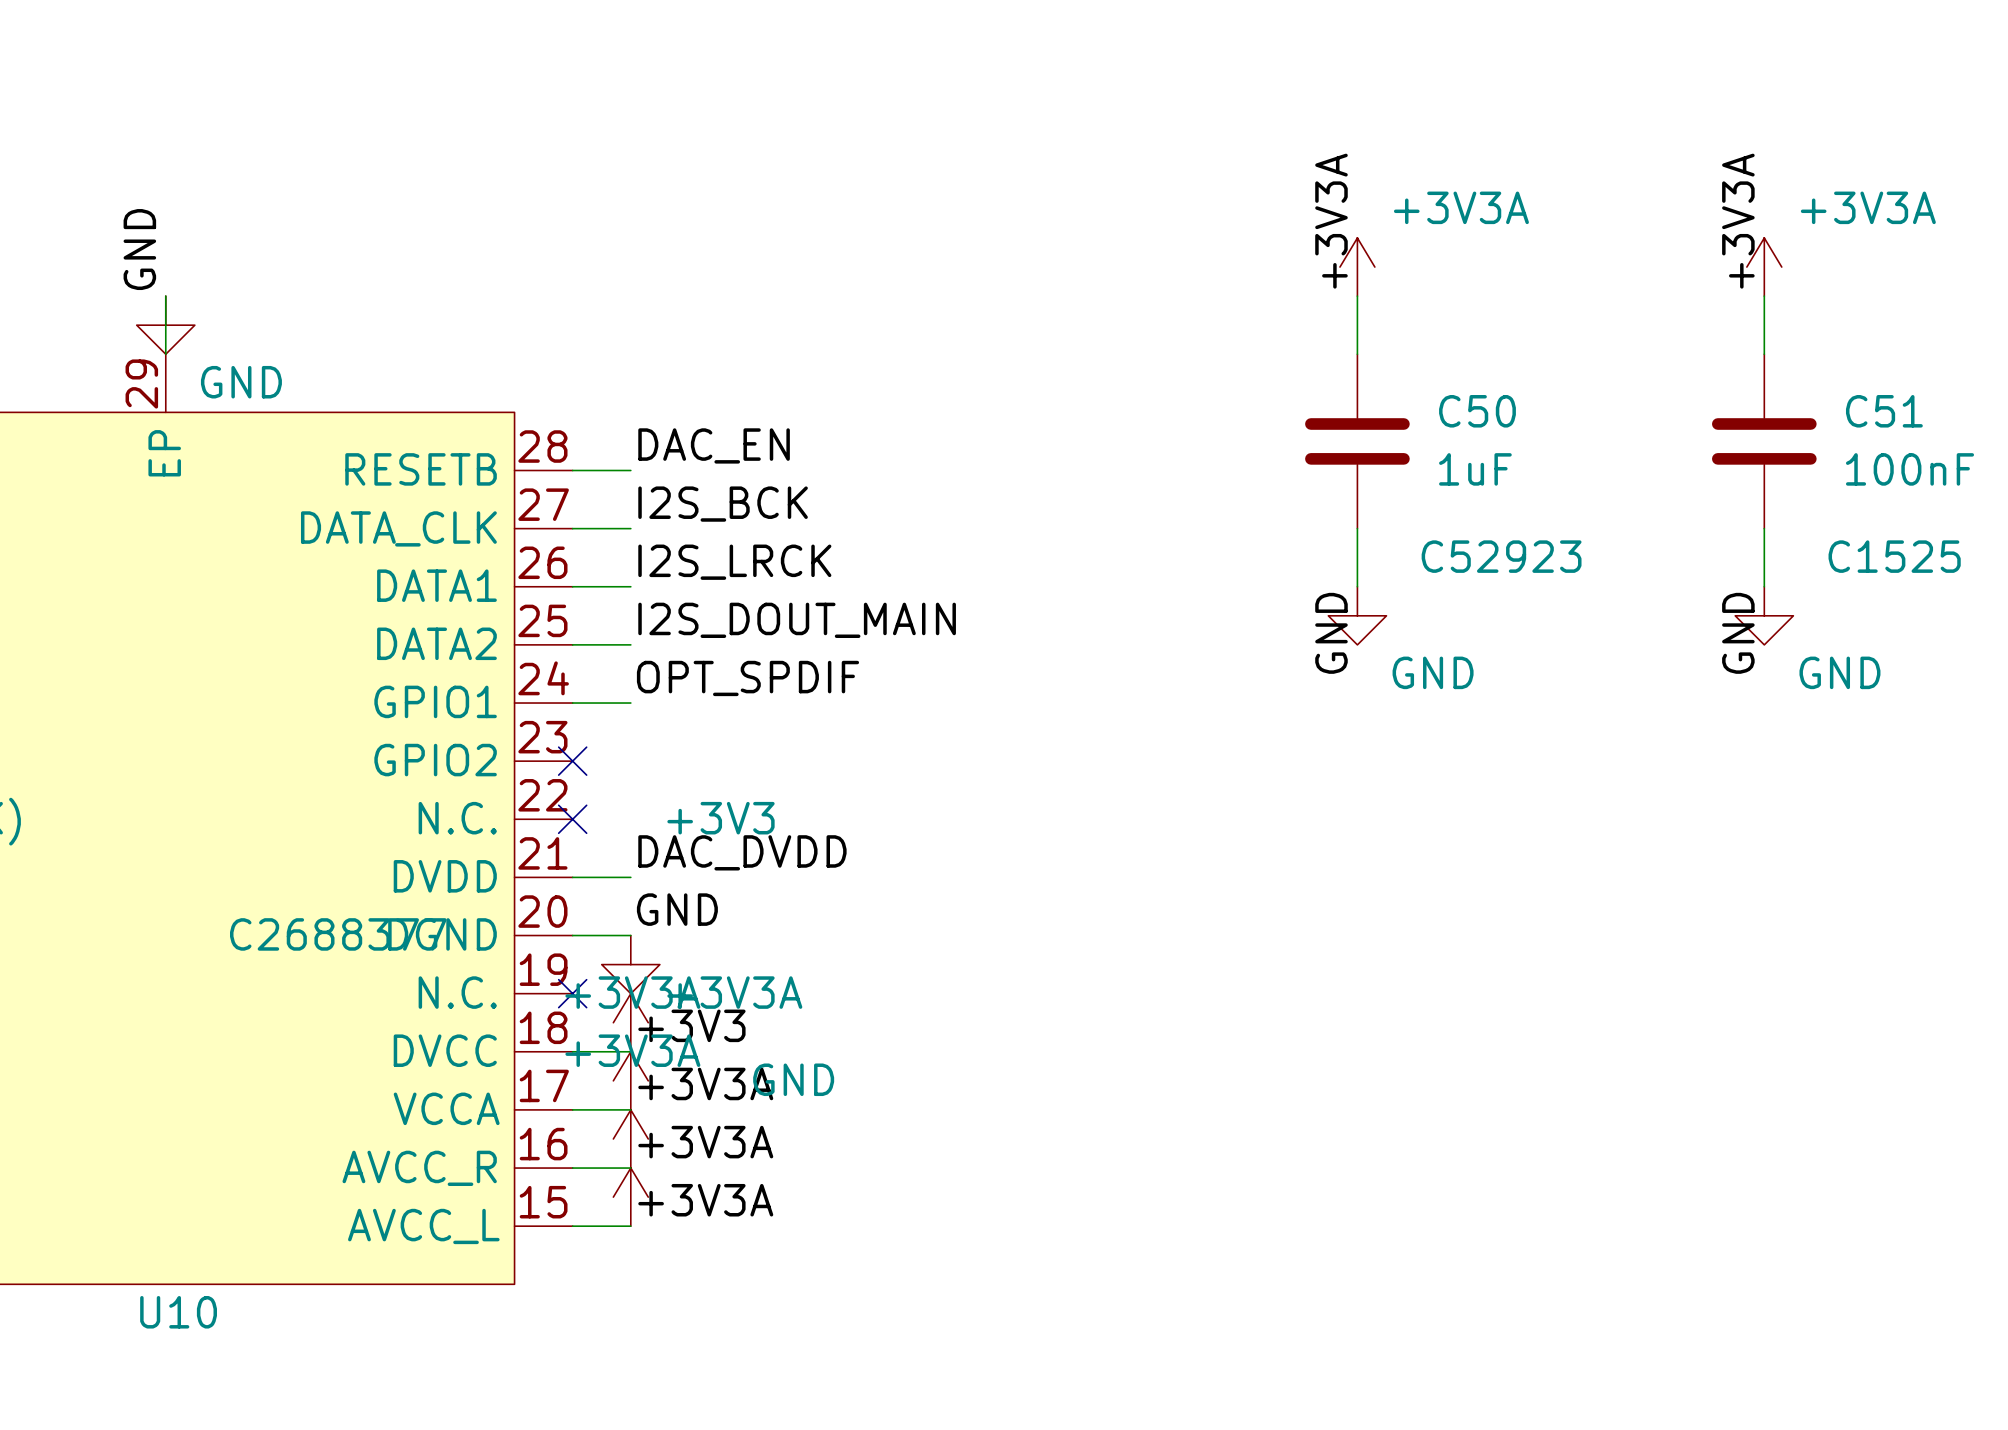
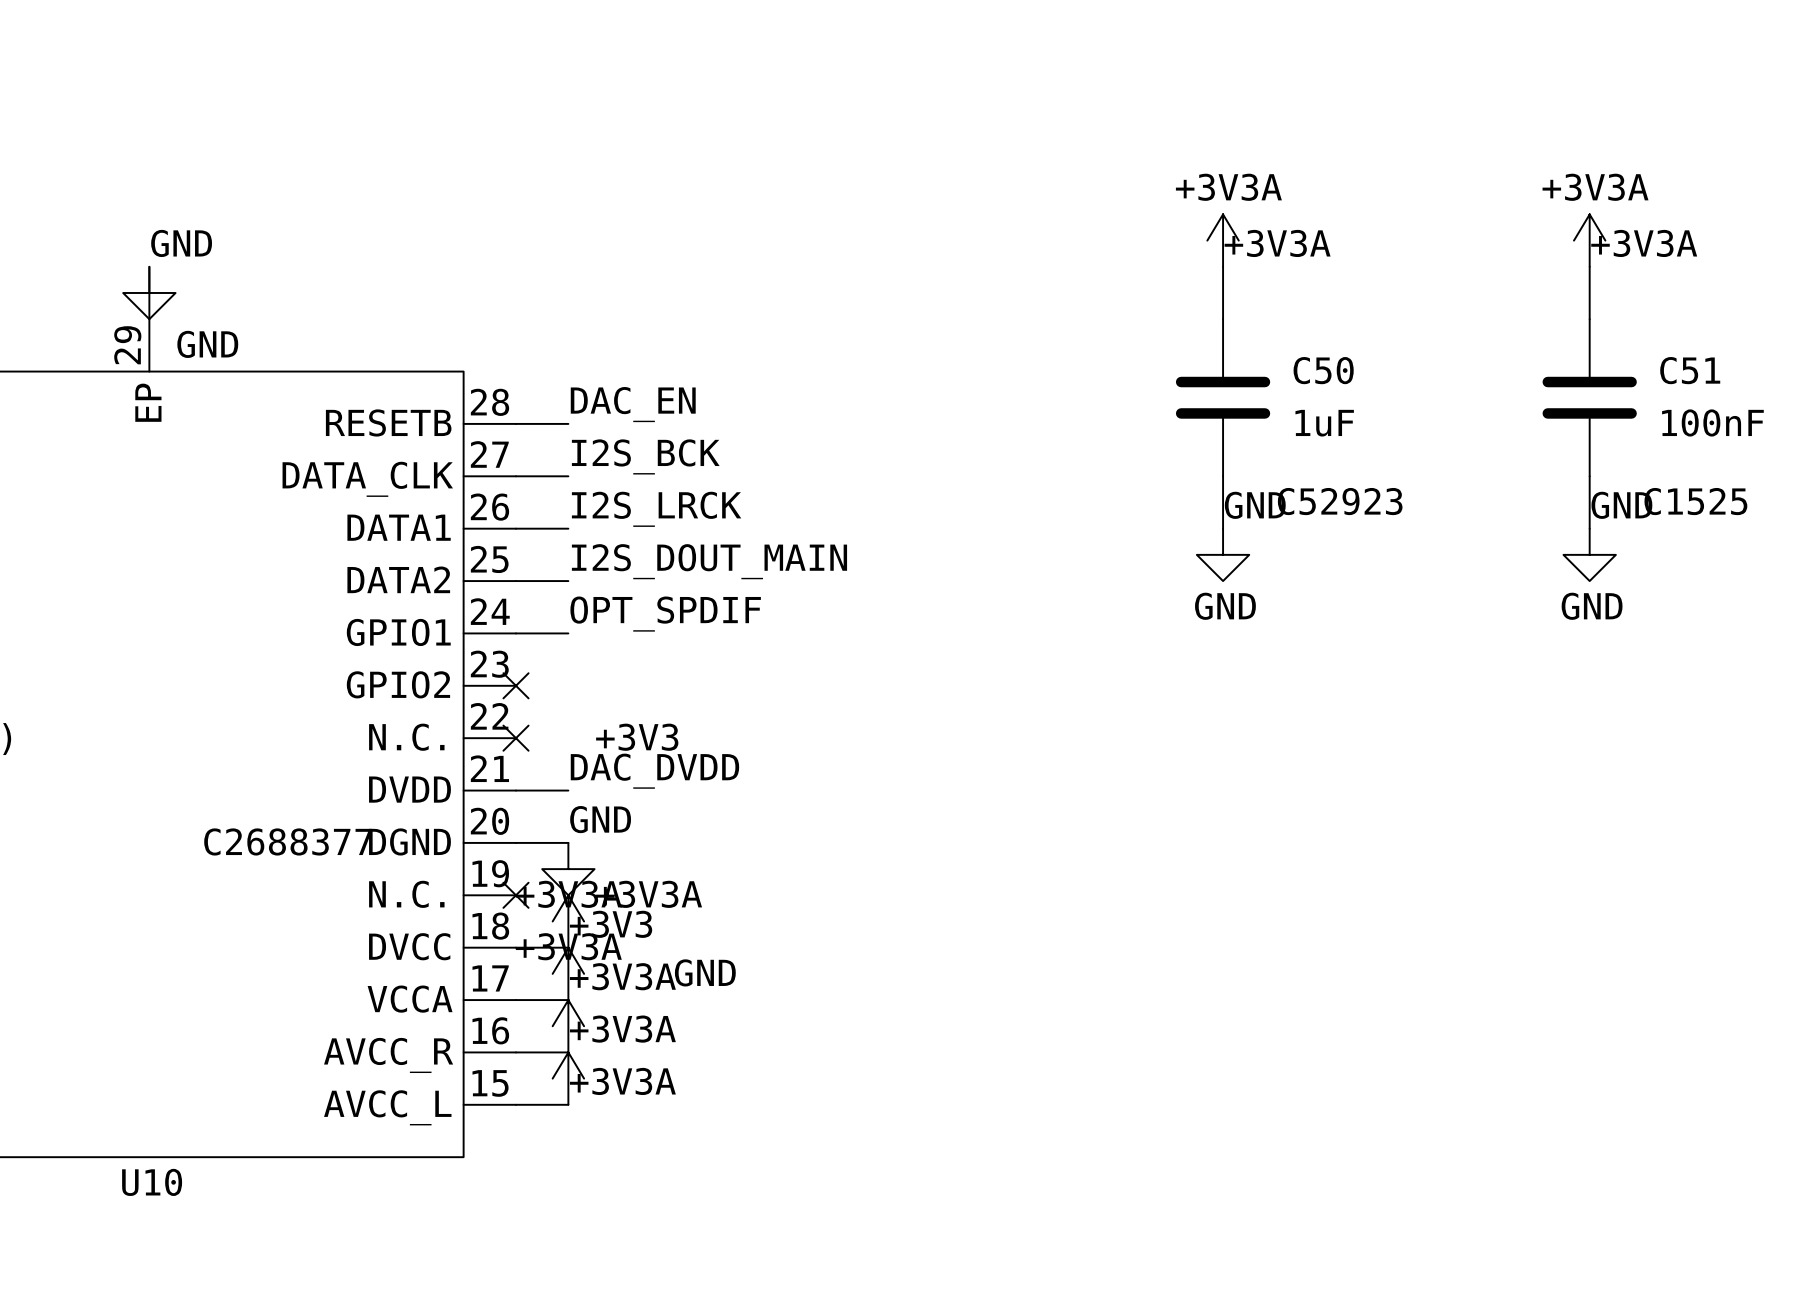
power symbol text position: +3V3A (1461, 207) -> +3V3A (1228, 187)
power symbol text position: +3V3A (1868, 207) -> +3V3A (1595, 187)
label rotation: 0° (1331, 221) -> 90° clockwise (1277, 243)
label rotation: 0° (1738, 221) -> 90° clockwise (1644, 243)
label rotation: 0° (139, 249) -> 90° clockwise (181, 243)
label rotation: 0° (1331, 633) -> 90° clockwise (1255, 505)
label position: GND (1331, 633) -> GND (1255, 505)
label rotation: 0° (1738, 633) -> 90° clockwise (1621, 505)
label position: GND (1738, 633) -> GND (1621, 505)
power symbol text position: GND (1433, 672) -> GND (1225, 606)
power symbol text position: GND (1839, 672) -> GND (1592, 606)

